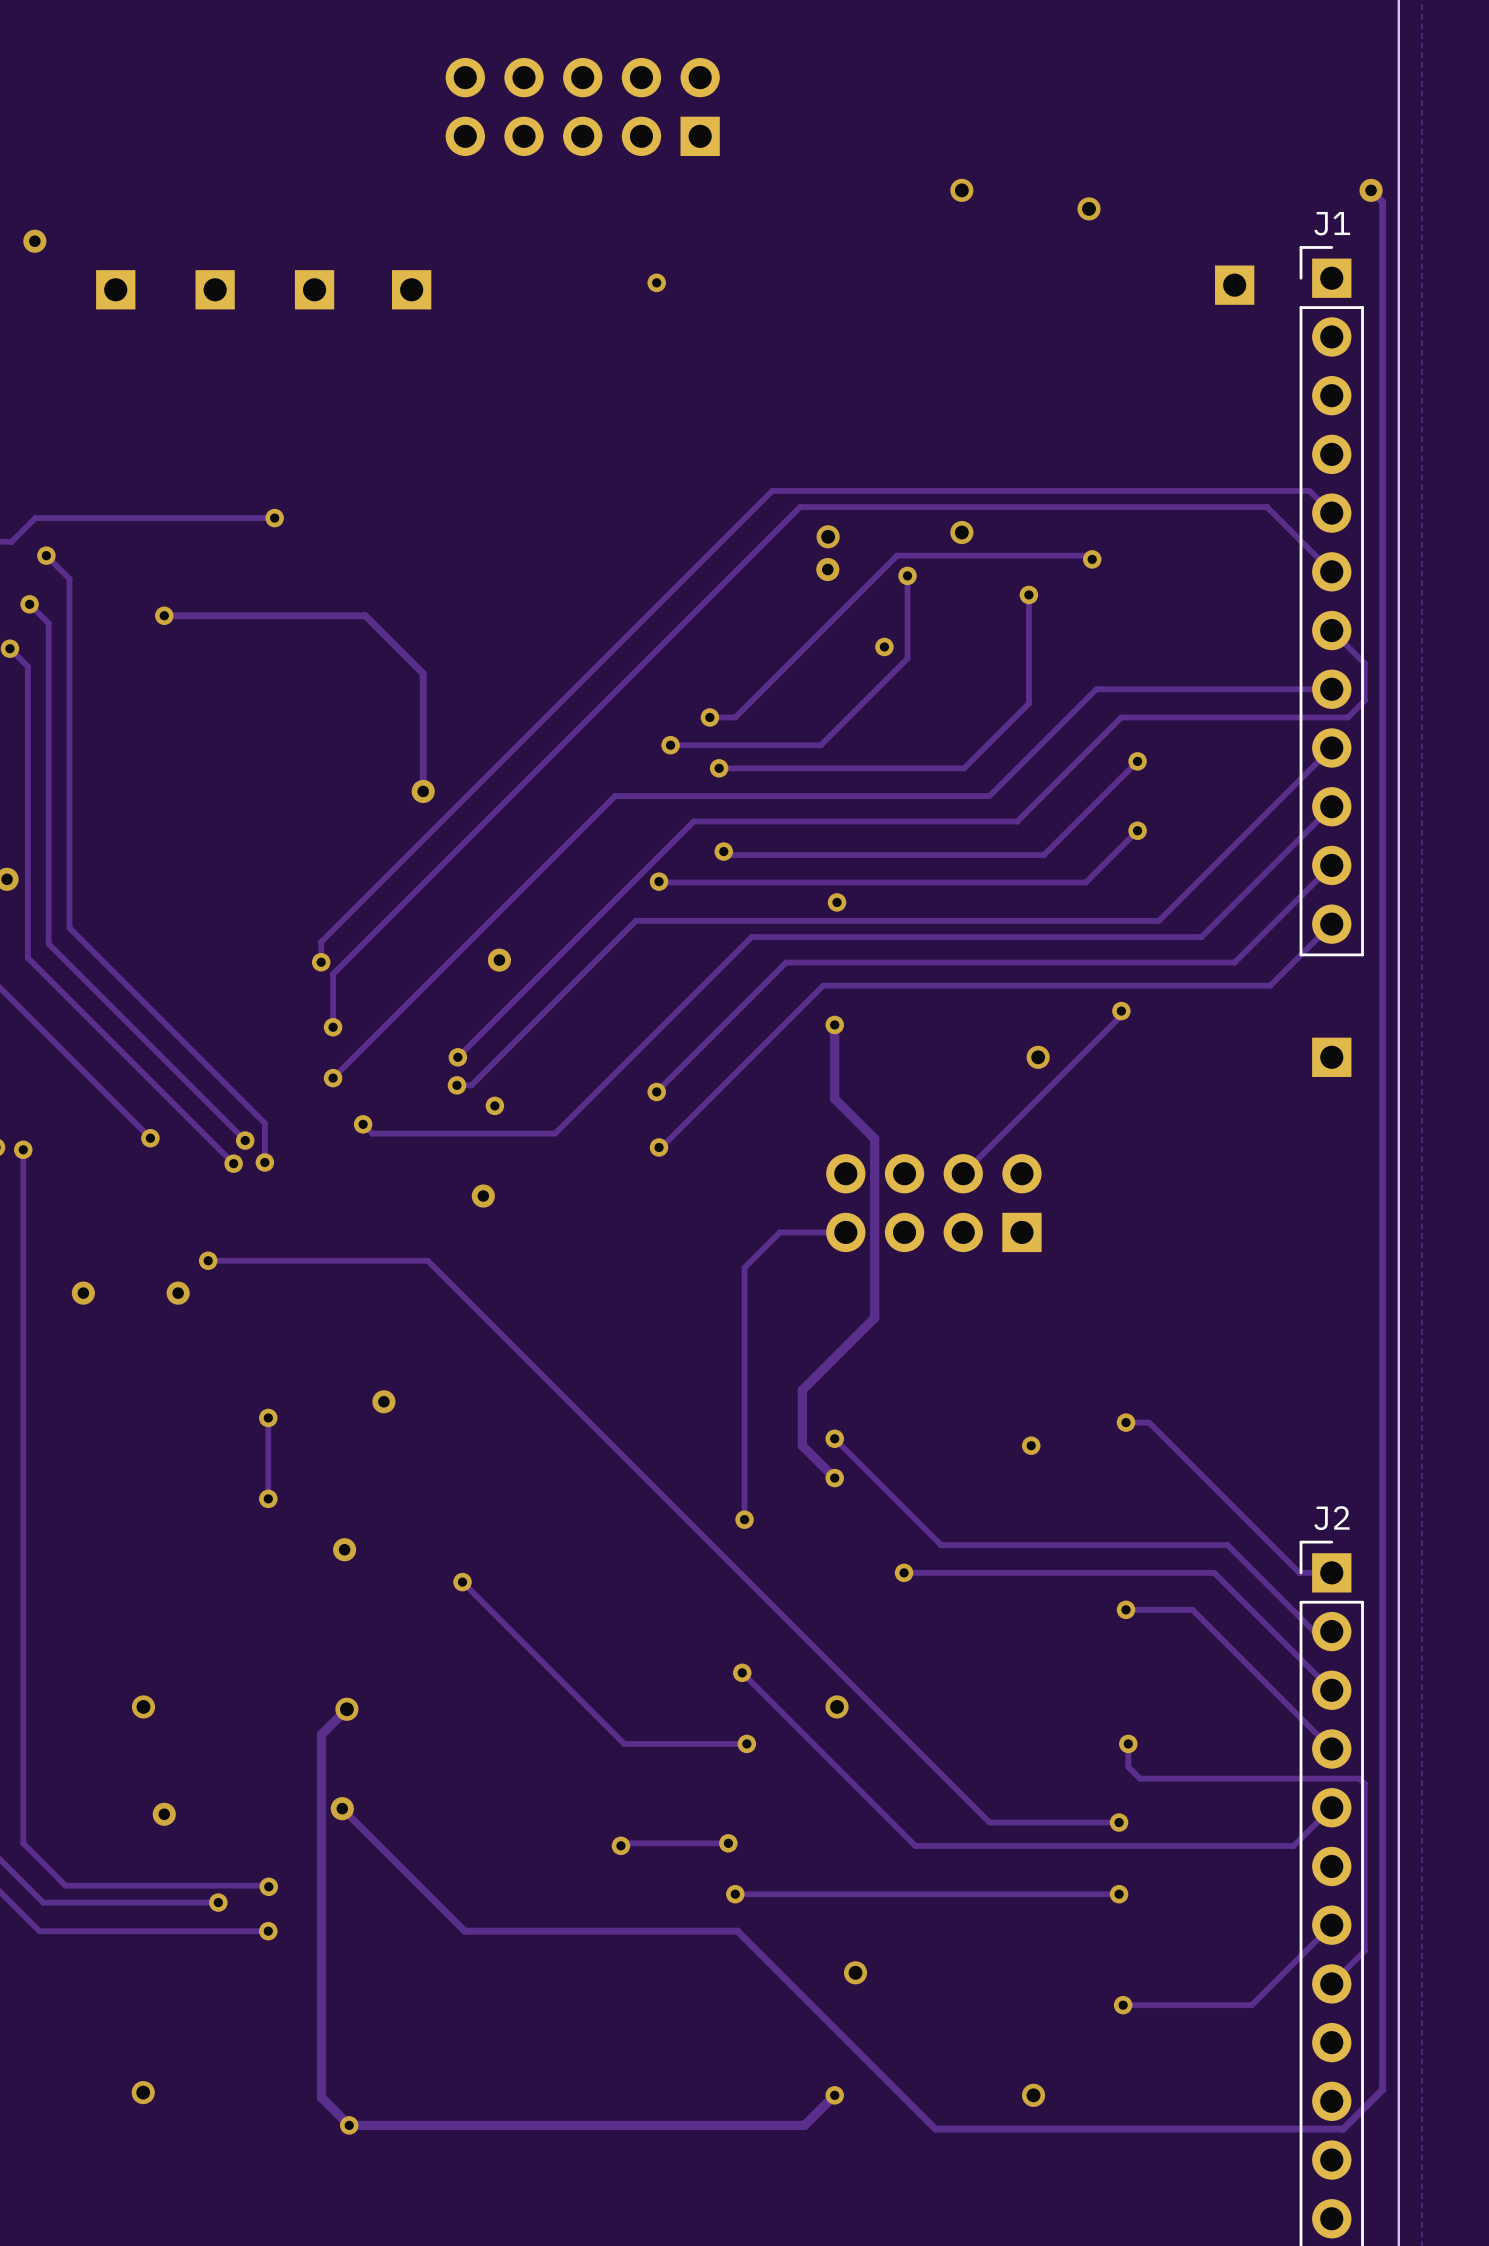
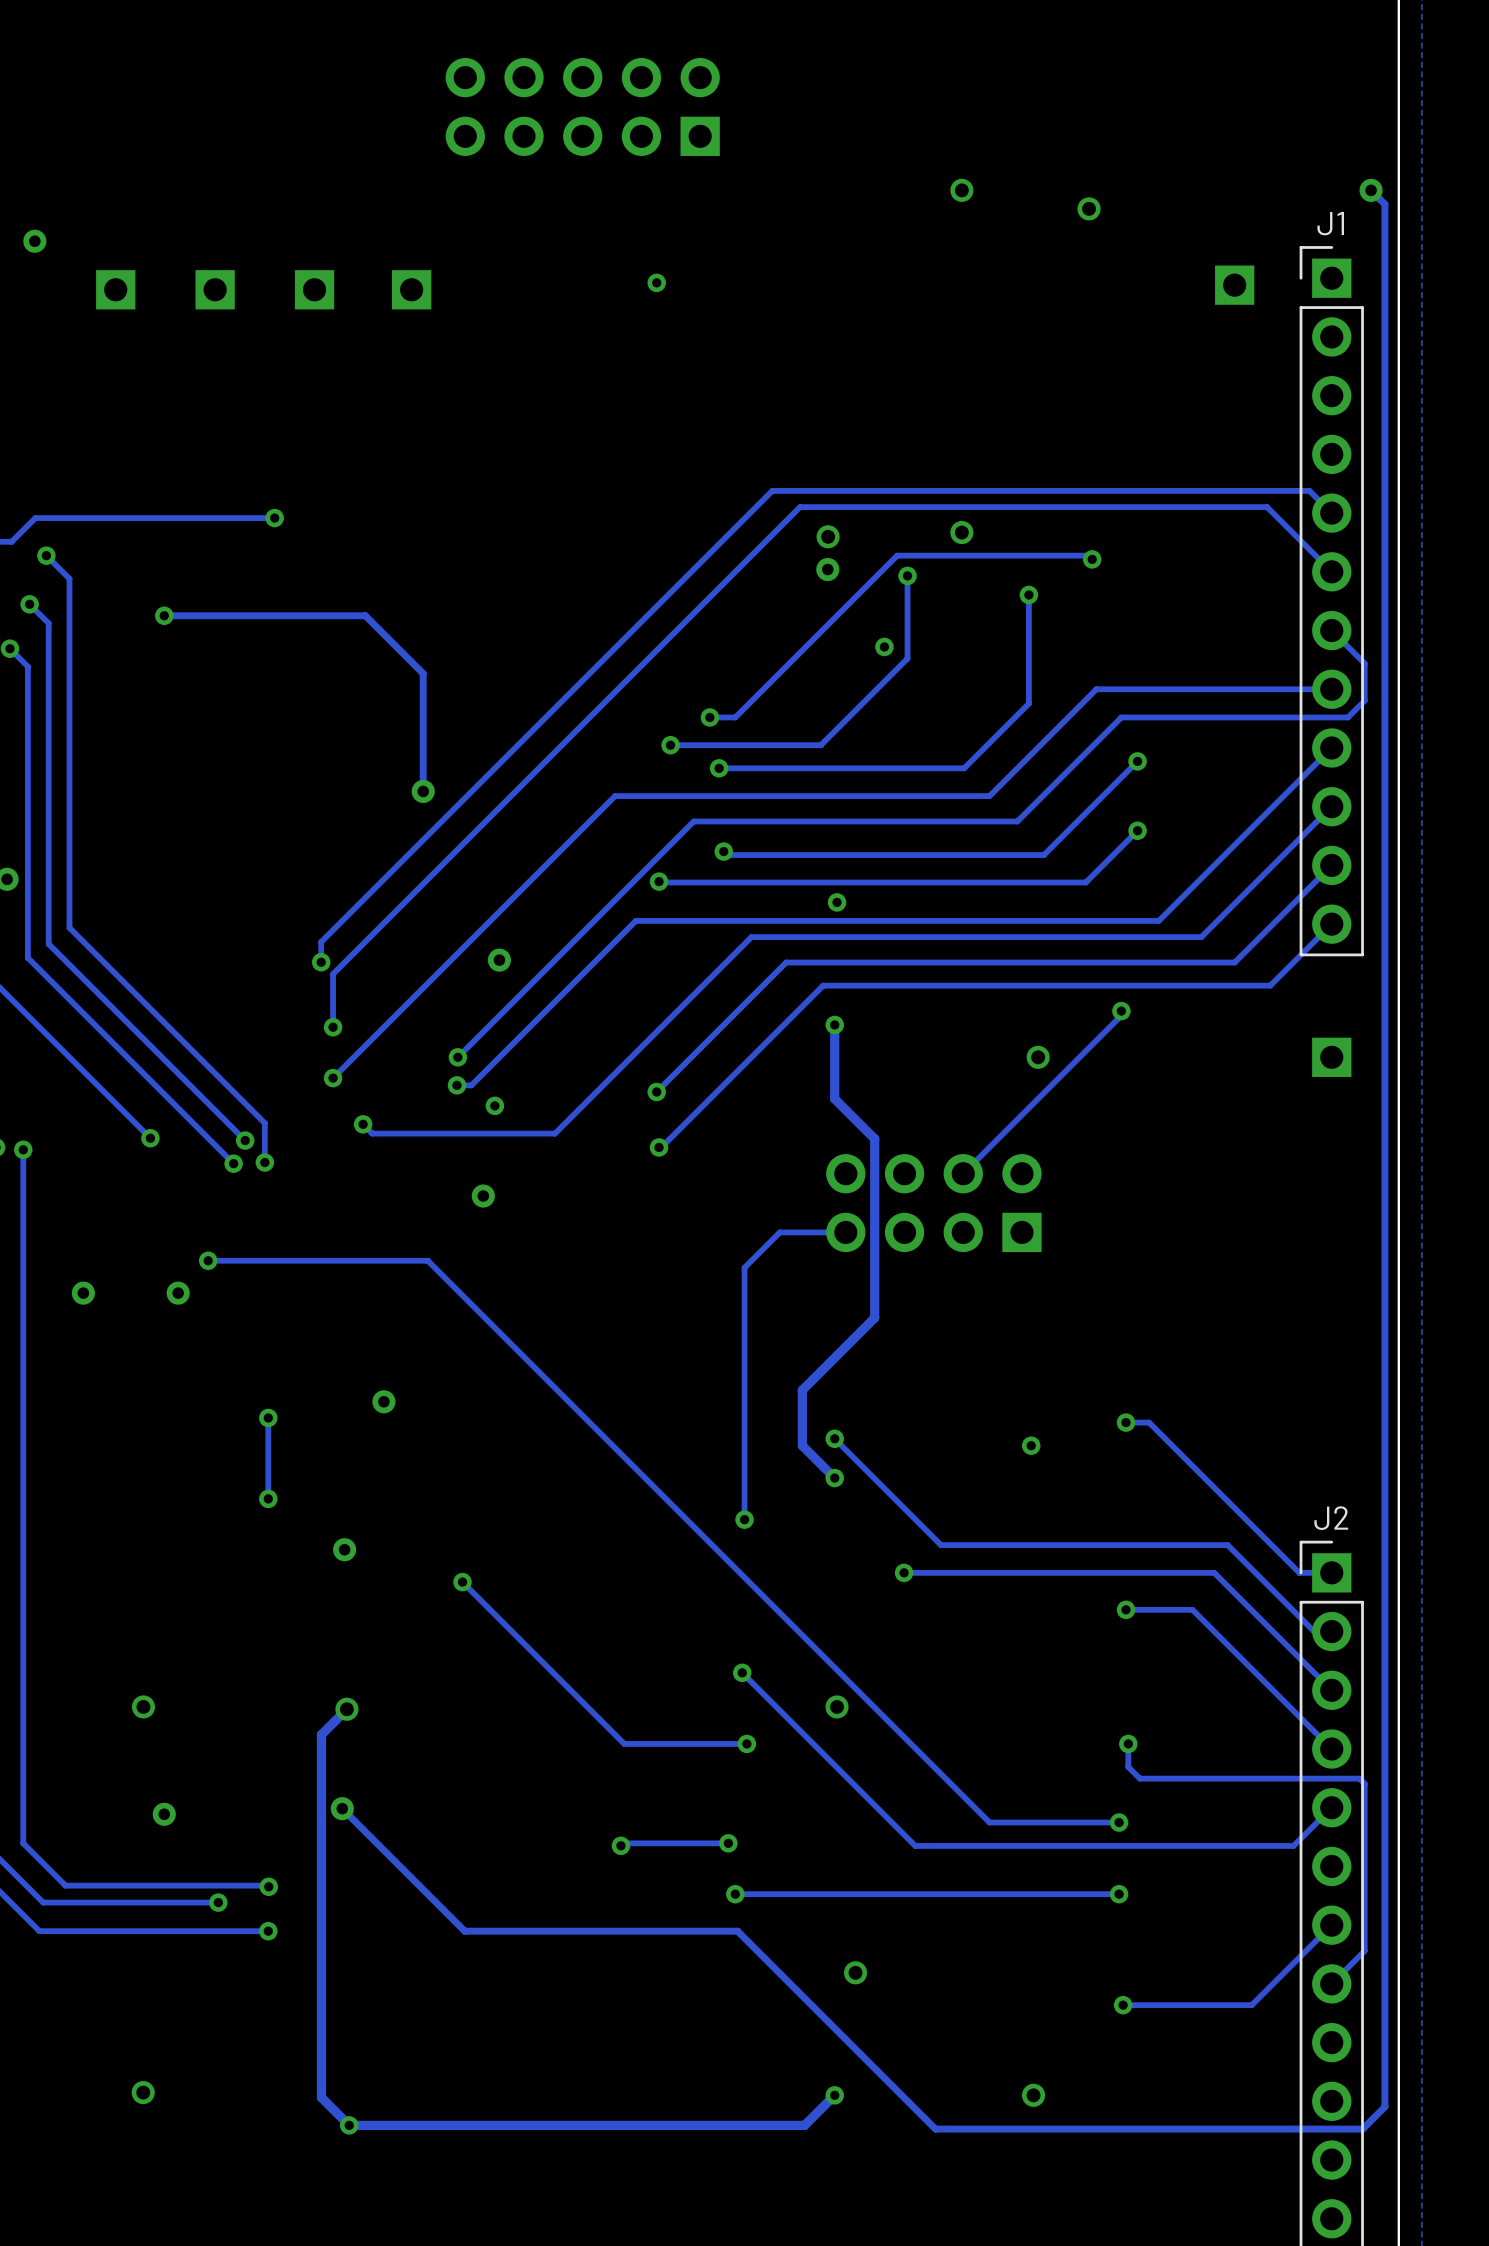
track: (1382, 201) (1382, 2089) (1343, 2129) -> (1382, 201) (1384, 204) (1384, 2106) (1362, 2129) (1343, 2129)

